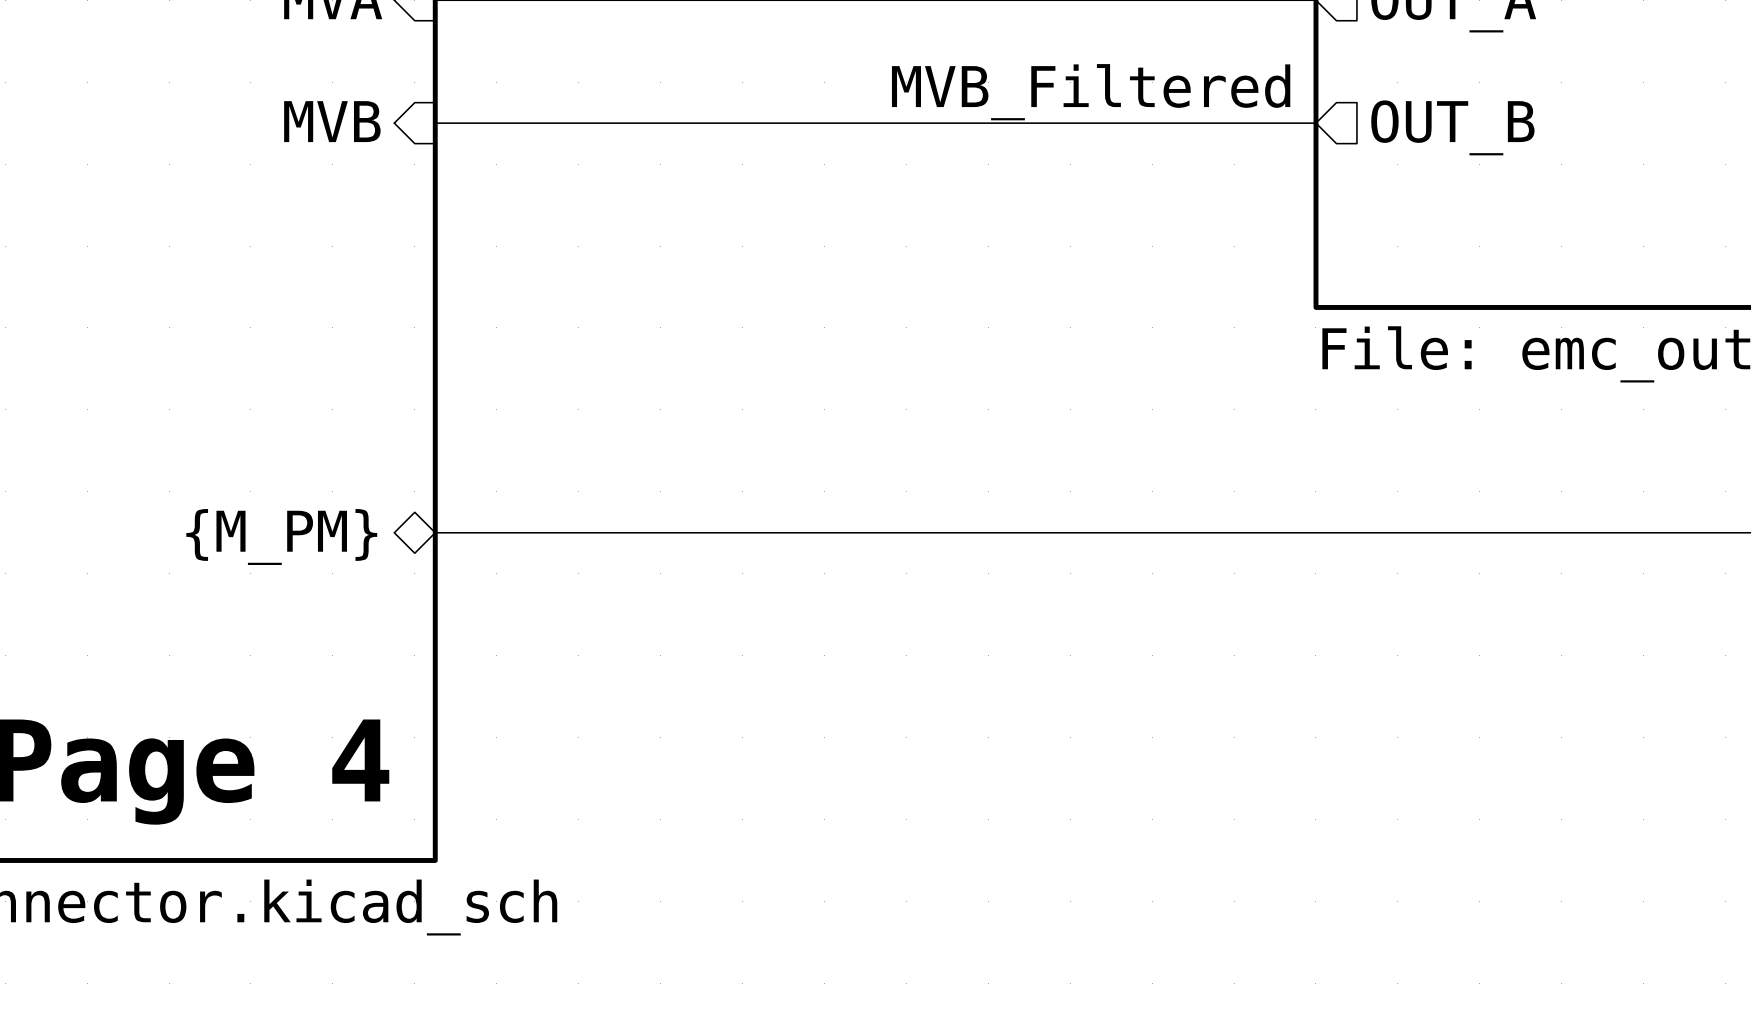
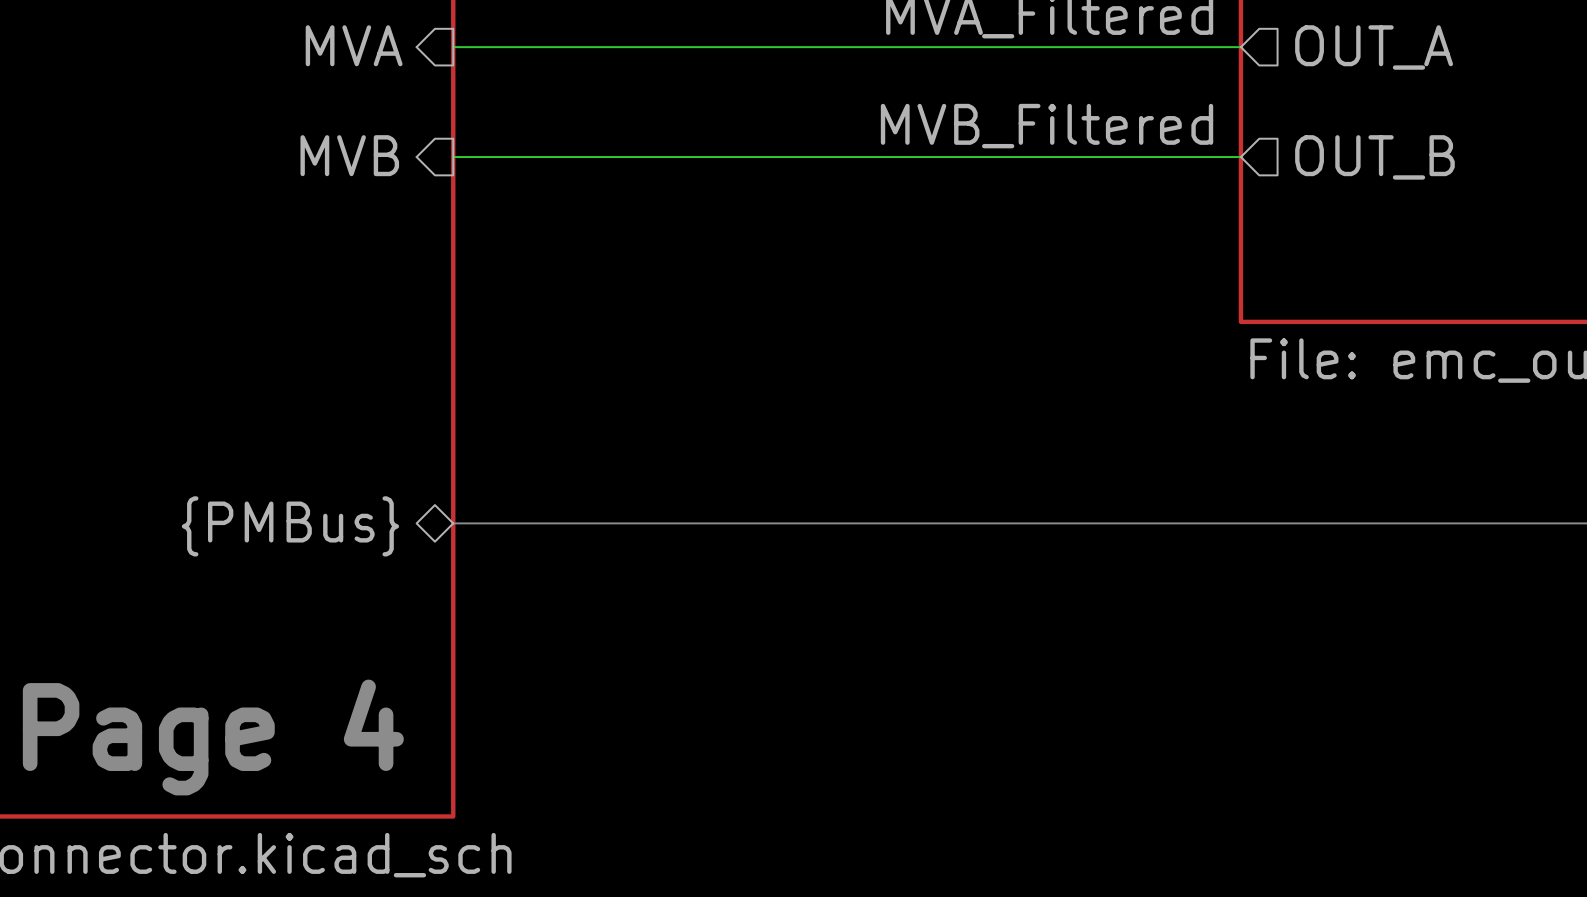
sheet pin: {M_PM} (281, 537) -> {PMBus} (290, 526)

